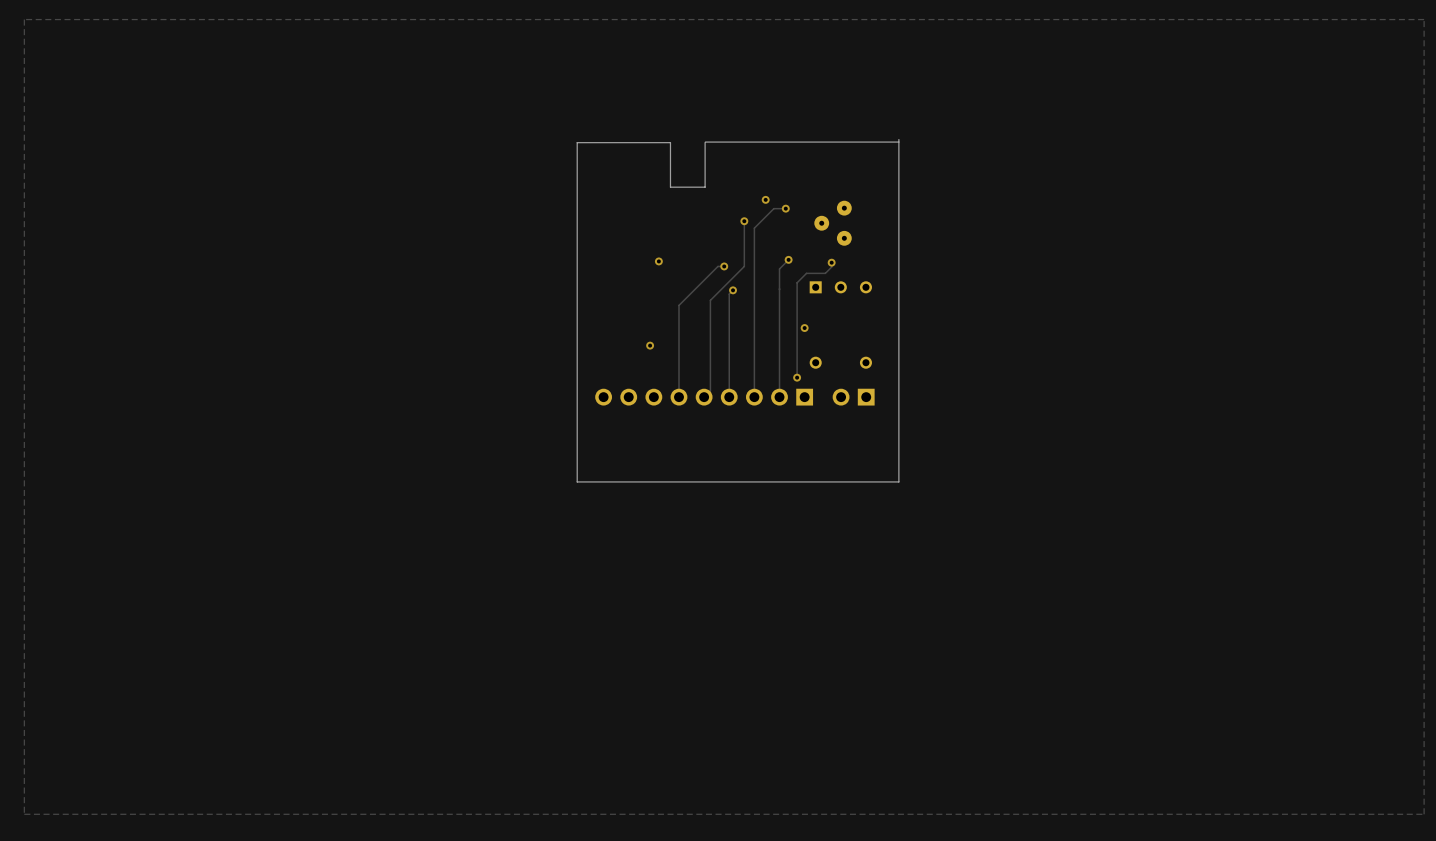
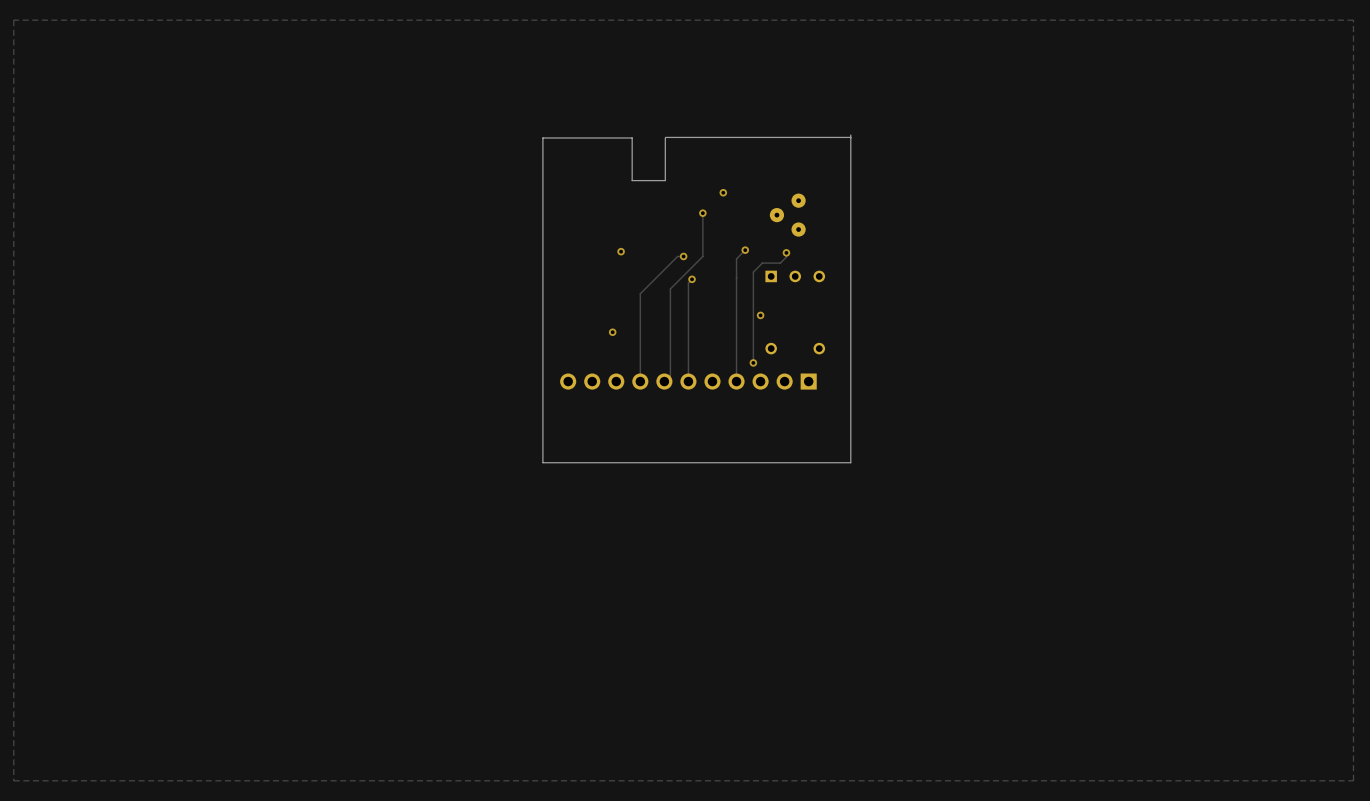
track: (785, 208) (773, 208) (754, 228) (754, 397) -> none
via: (785, 208) -> none
part: (704, 397) -> none
part: none -> (688, 381)
part: (853, 397) -> none

